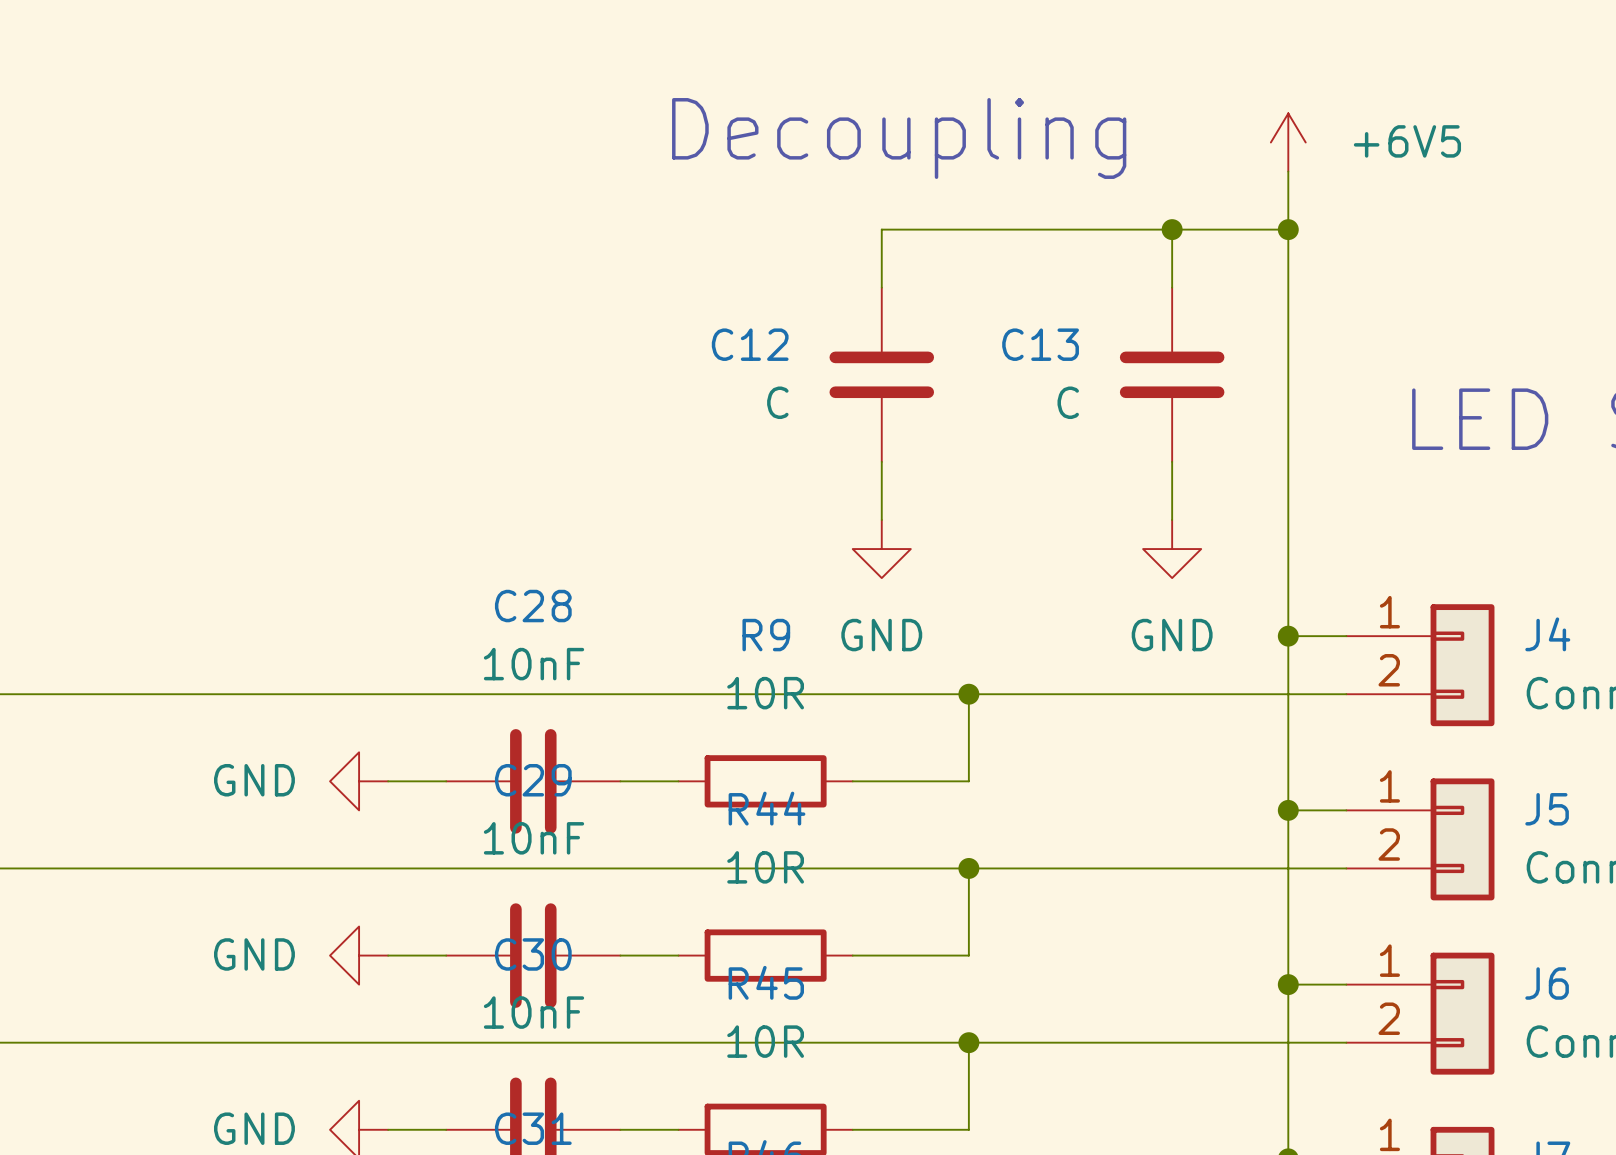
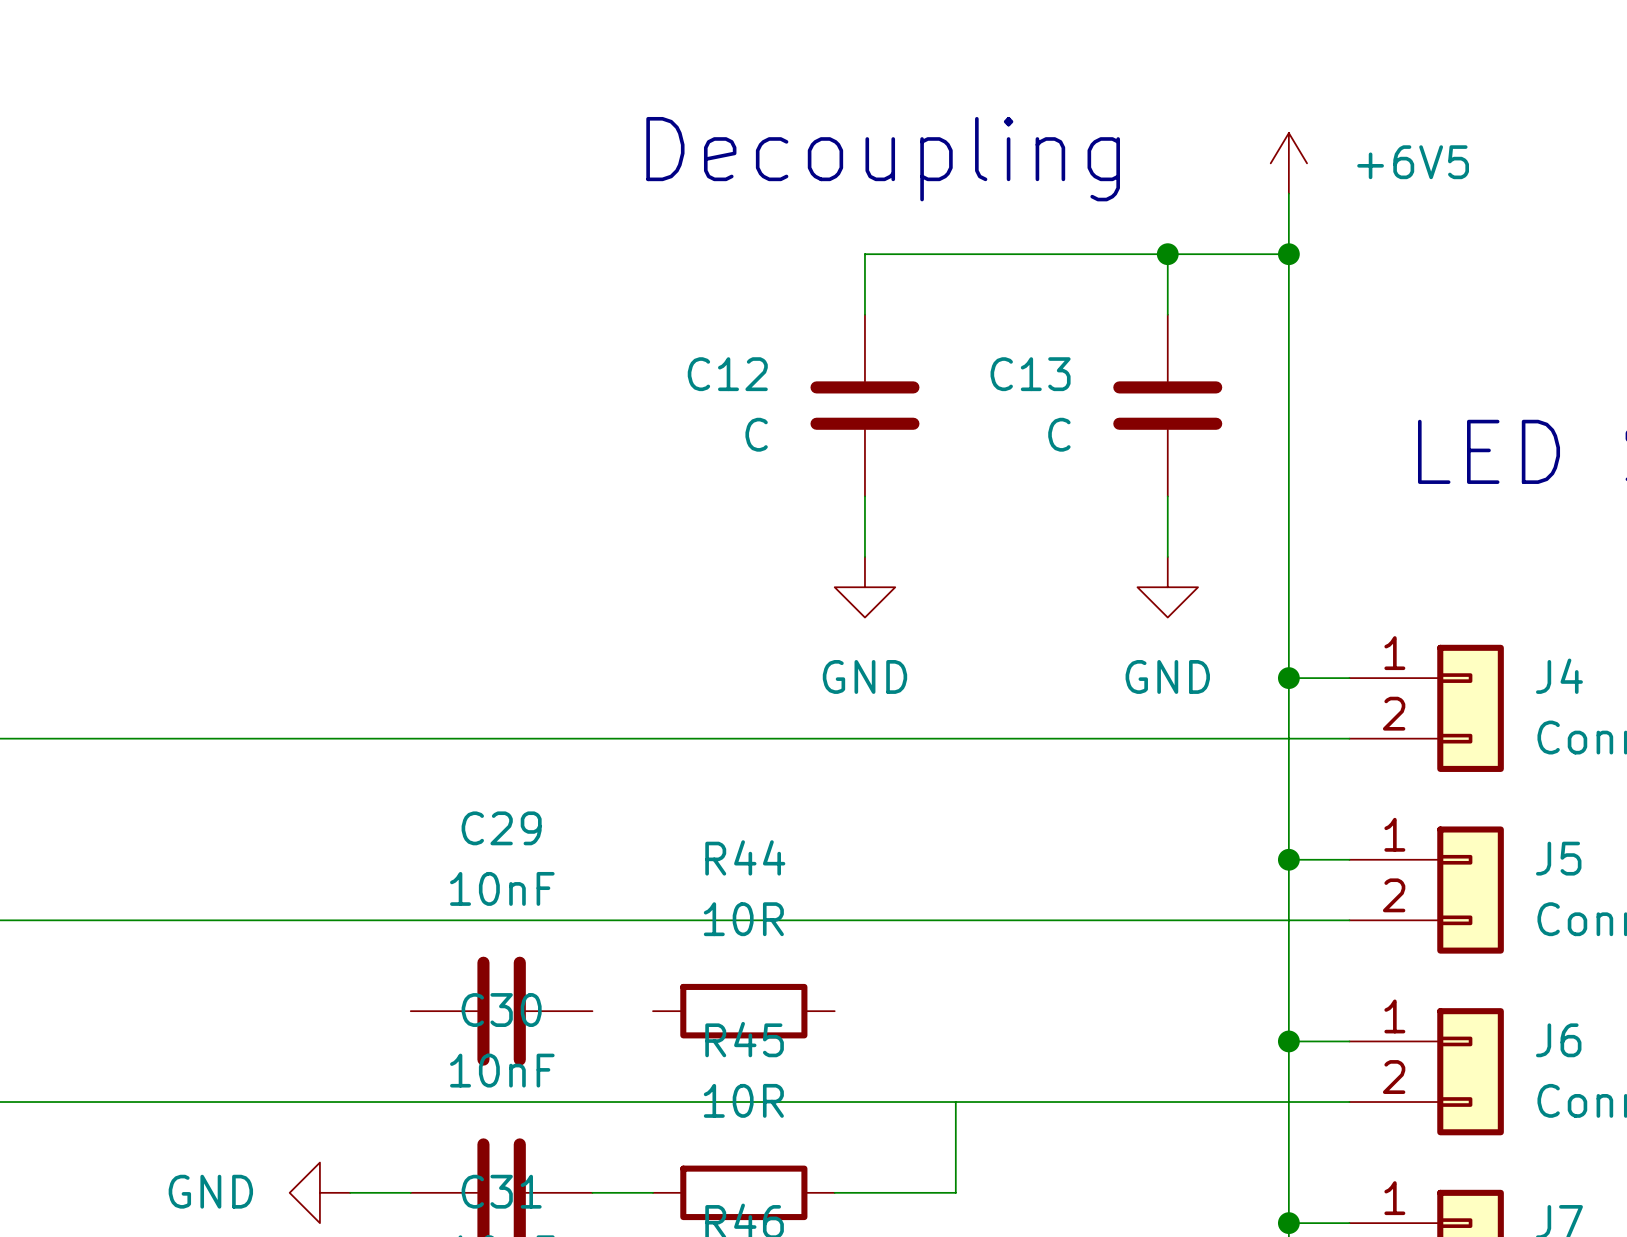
wire: (968, 694) (968, 781) (852, 781) -> none
junction: (968, 694) -> none
power symbol: GND (359, 781) -> none
wire: (388, 781) (446, 781) -> none
C28: 10nF (533, 781) -> none
wire: (620, 781) (678, 781) -> none
R9: 10R (765, 781) -> none
wire: (968, 868) (968, 955) (852, 955) -> none
junction: (968, 868) -> none
power symbol: GND (359, 955) -> none
wire: (388, 955) (446, 955) -> none
wire: (620, 955) (678, 955) -> none
junction: (968, 1042) -> none

